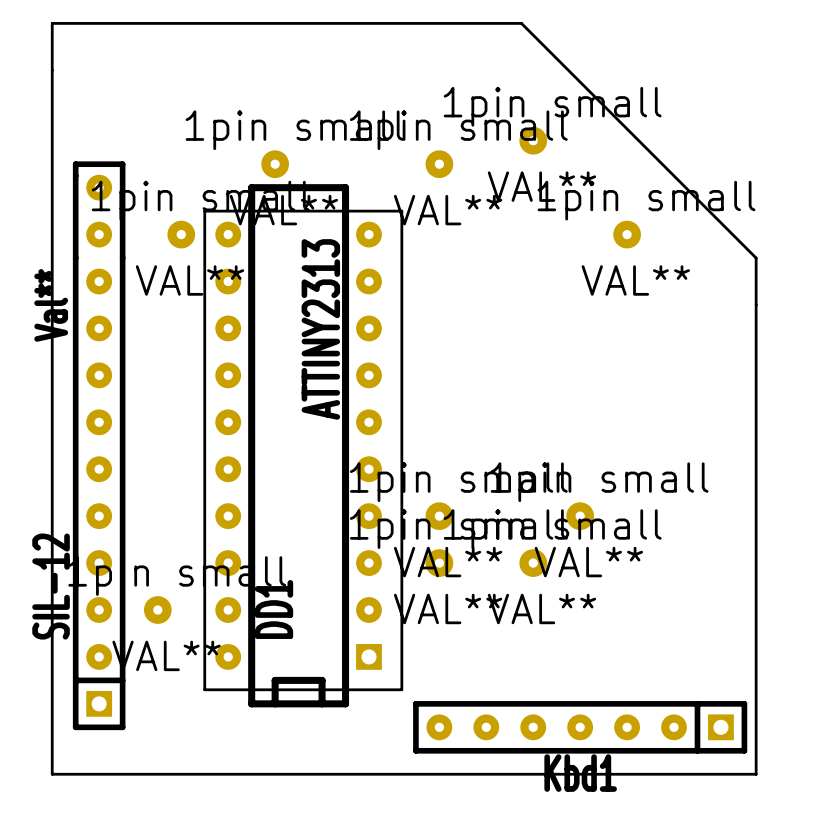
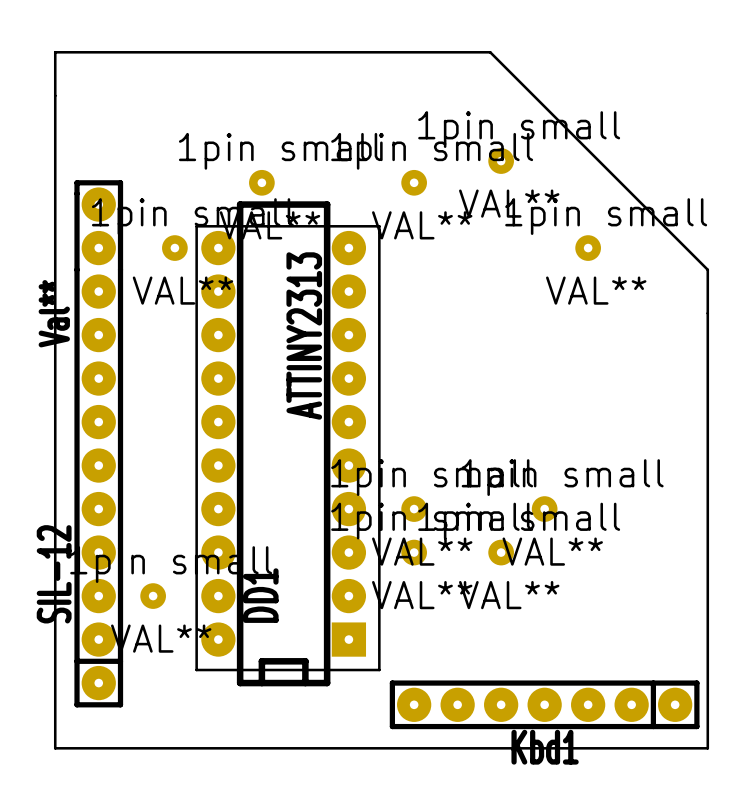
SIL-12 footprint: [72, 161, 126, 731] -> [74, 180, 124, 708]
DD1 footprint: [203, 184, 404, 708] -> [195, 201, 381, 687]
Kbd1 footprint: [413, 701, 748, 754] -> [389, 680, 700, 730]

